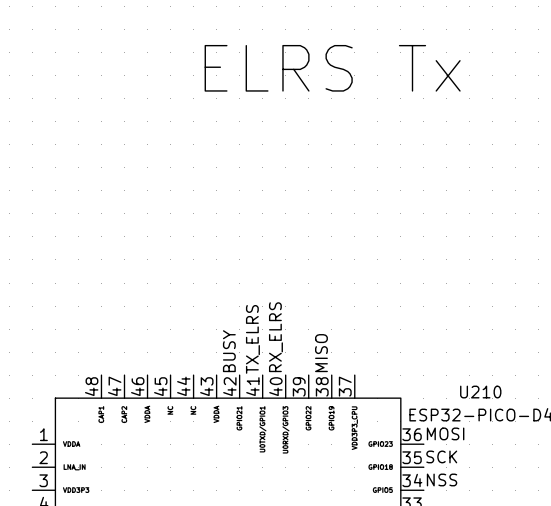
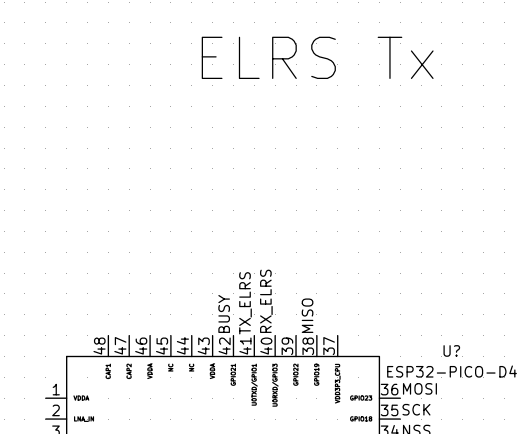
U210 name: U210 (480, 392) -> U? (451, 350)

